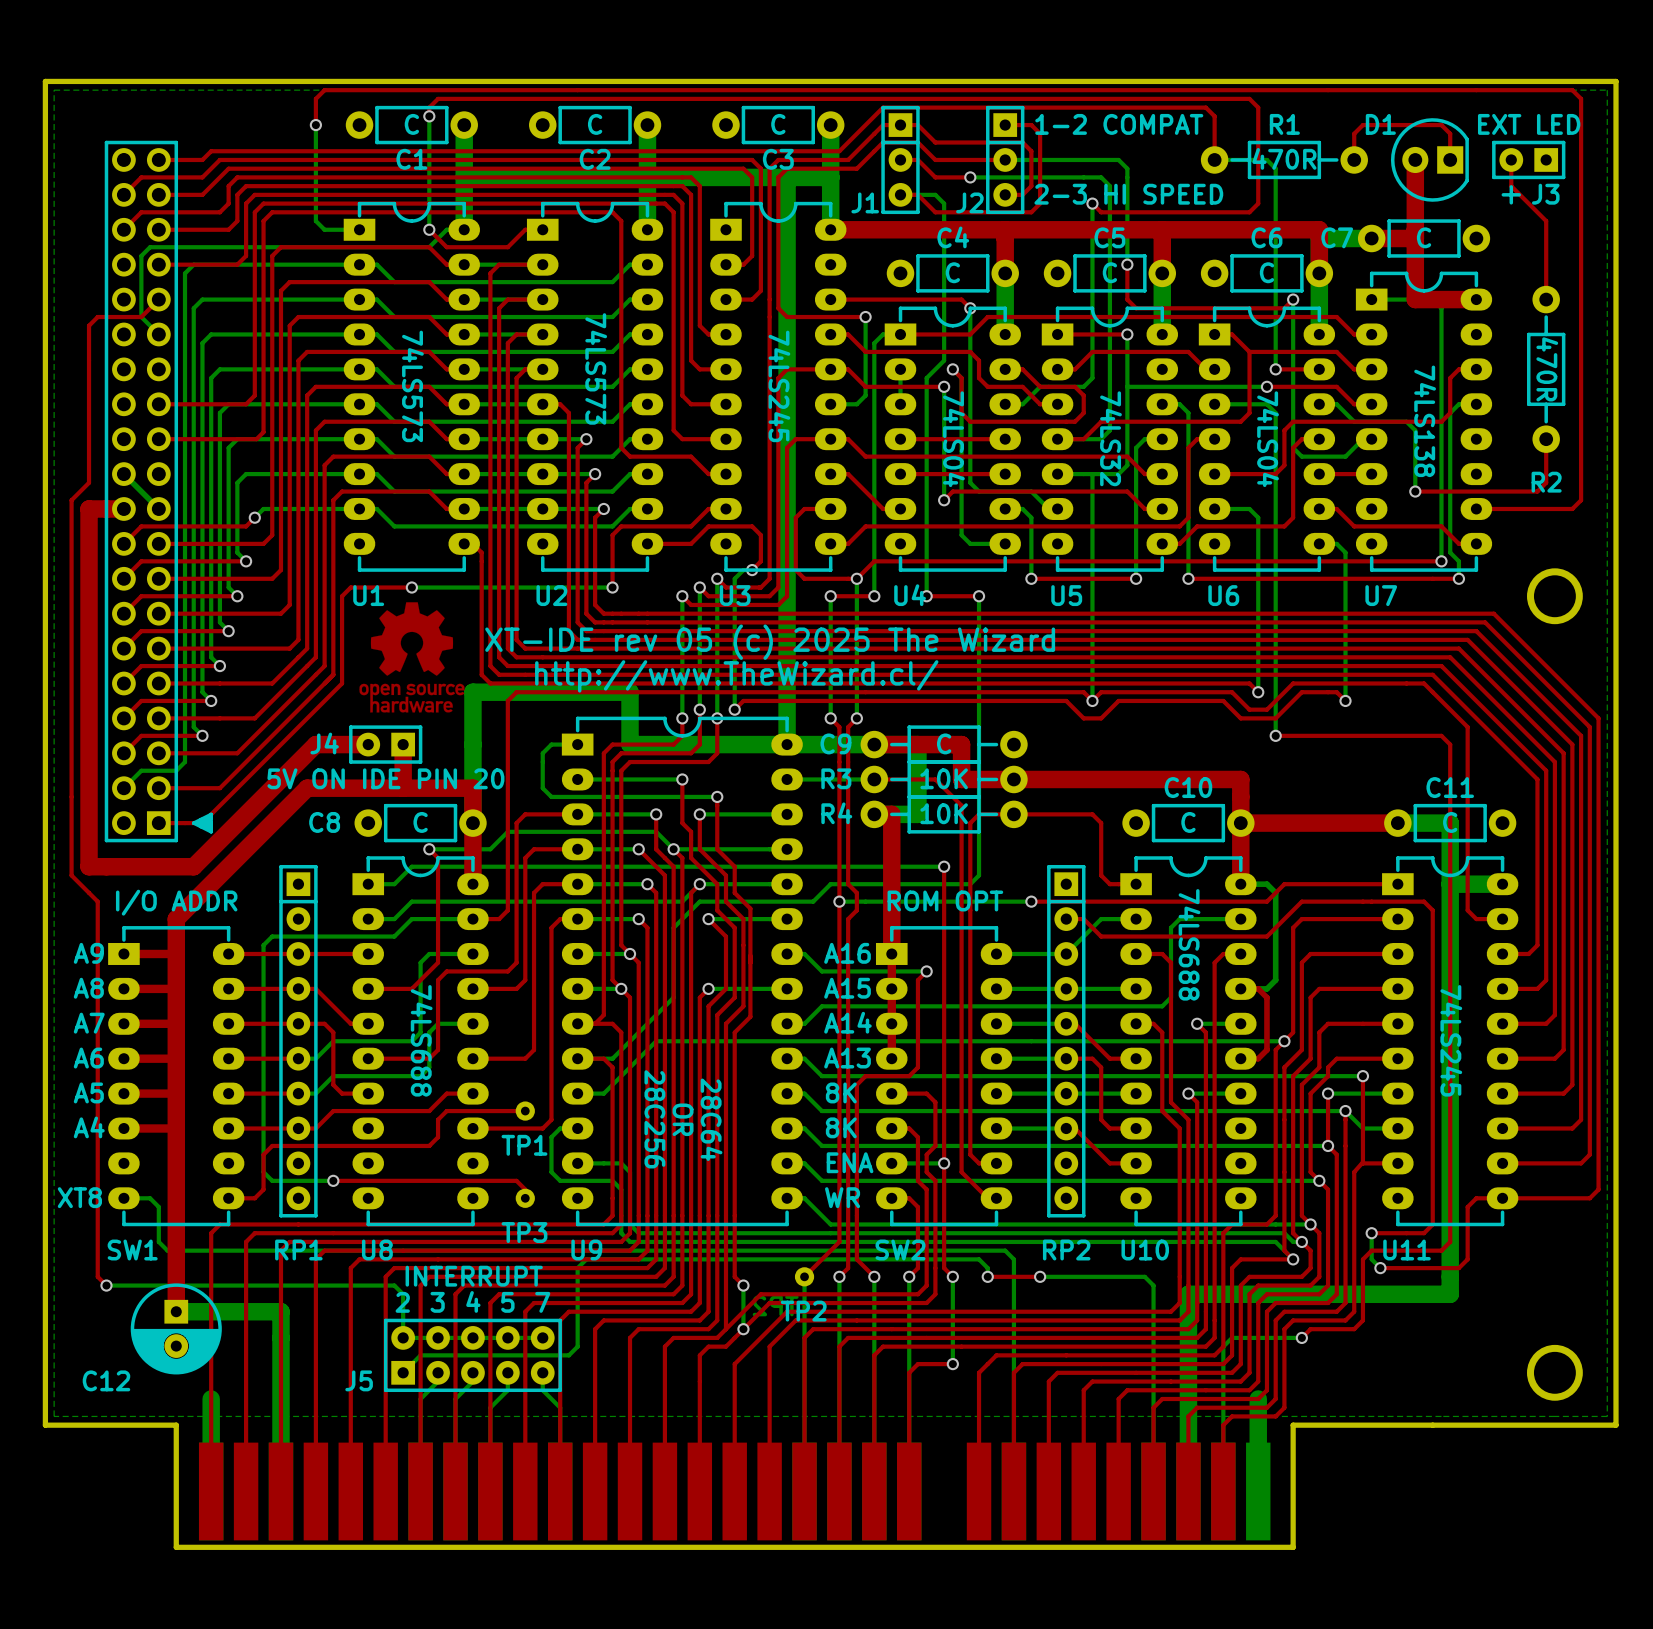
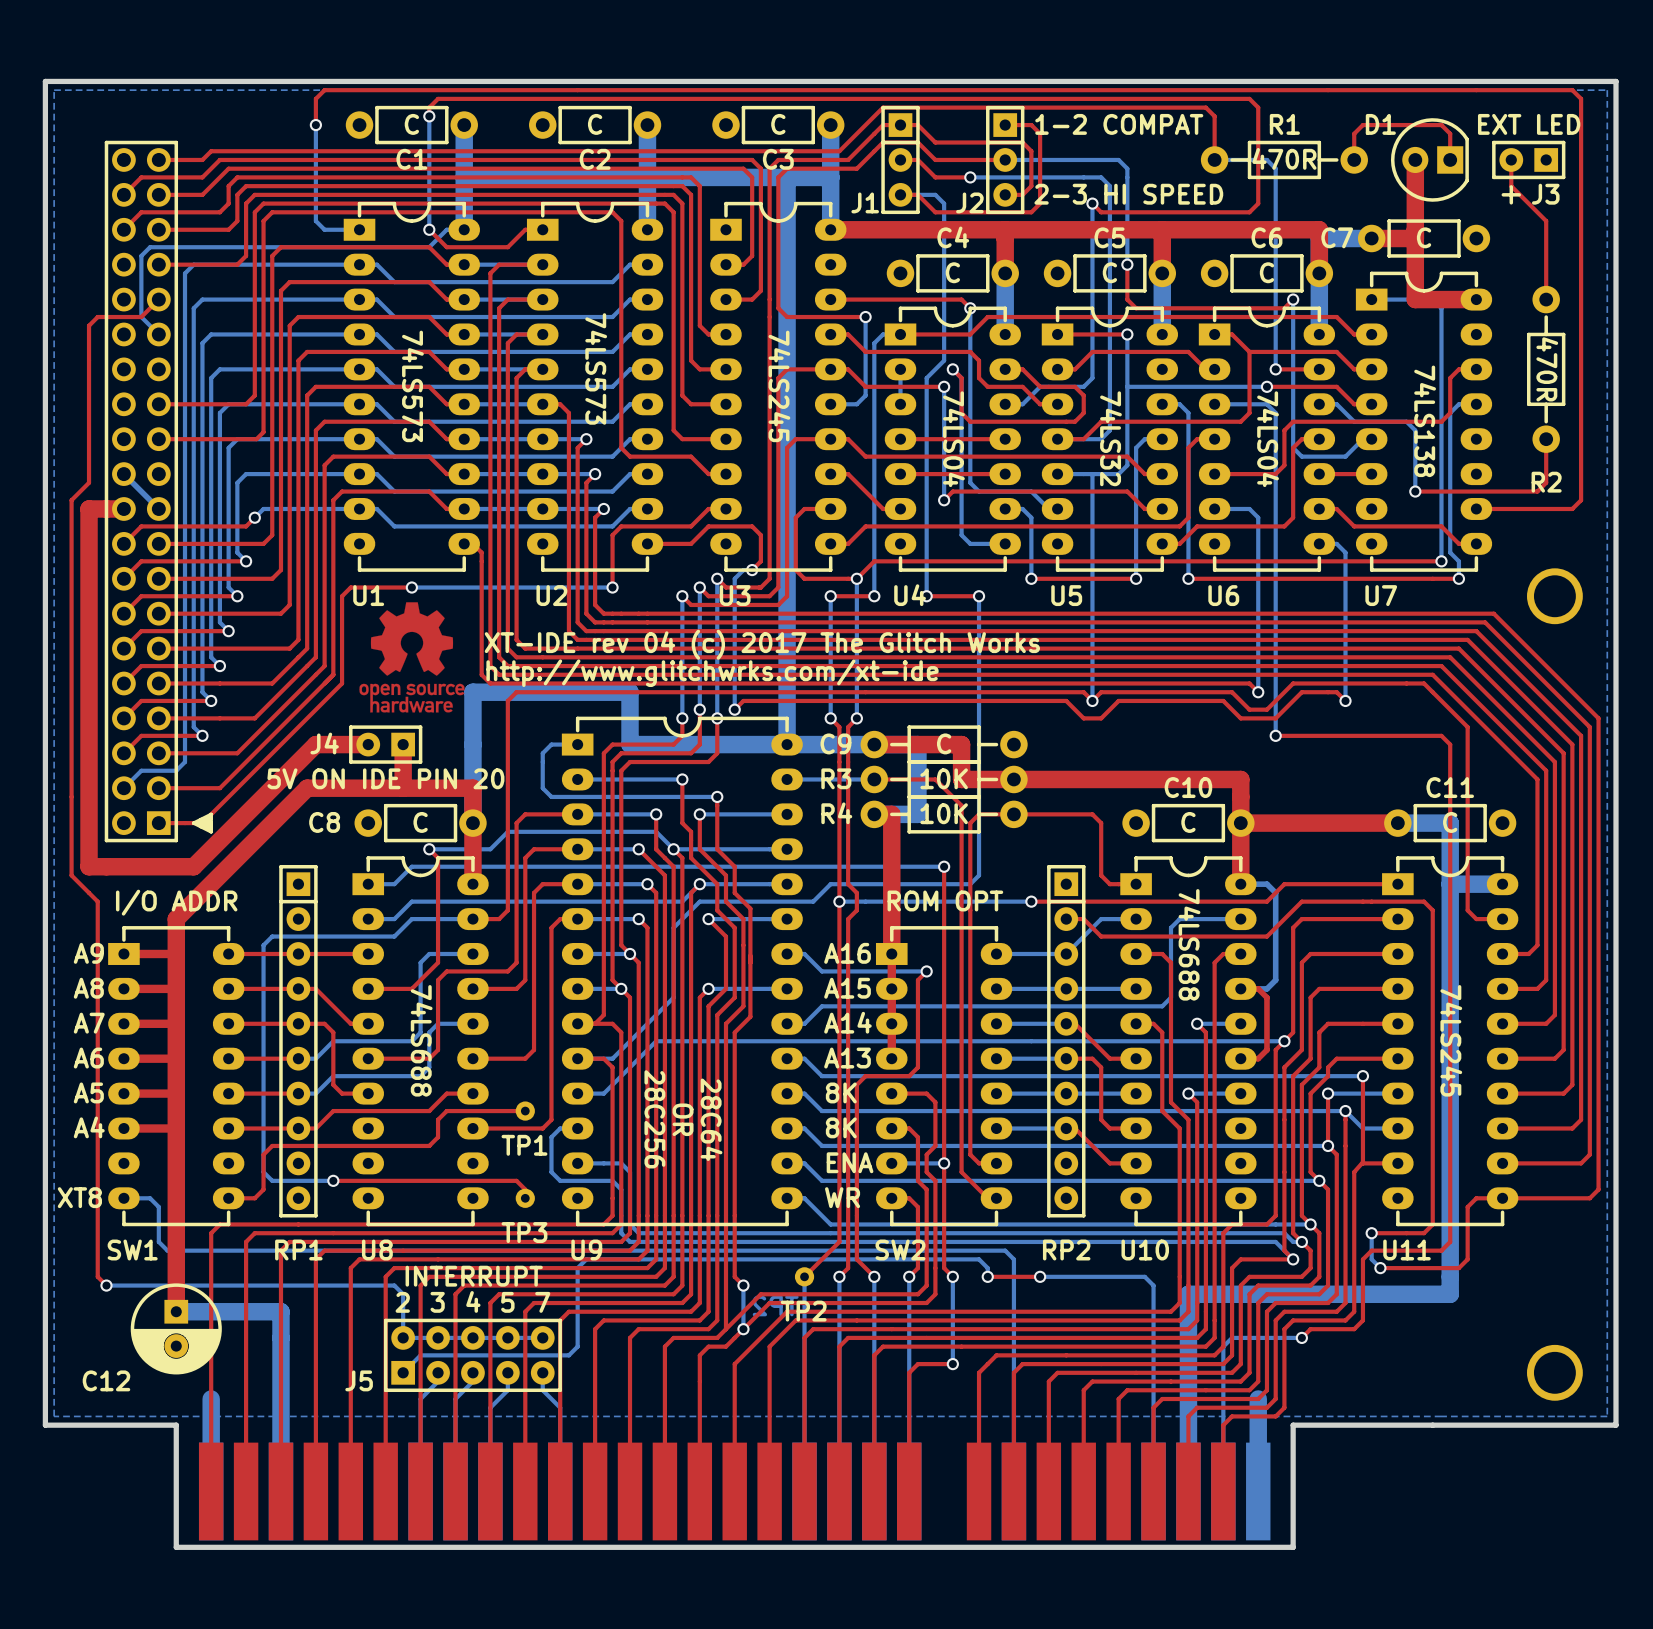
text: XT-IDE rev 05 (c) 2025 The Wizard (770, 642) -> XT-IDE rev 04 (c) 2017 The Glitch Works (762, 644)
text: http://www.TheWizard.cl/ (736, 676) -> http://www.glitchwrks.com/xt-ide (712, 673)

